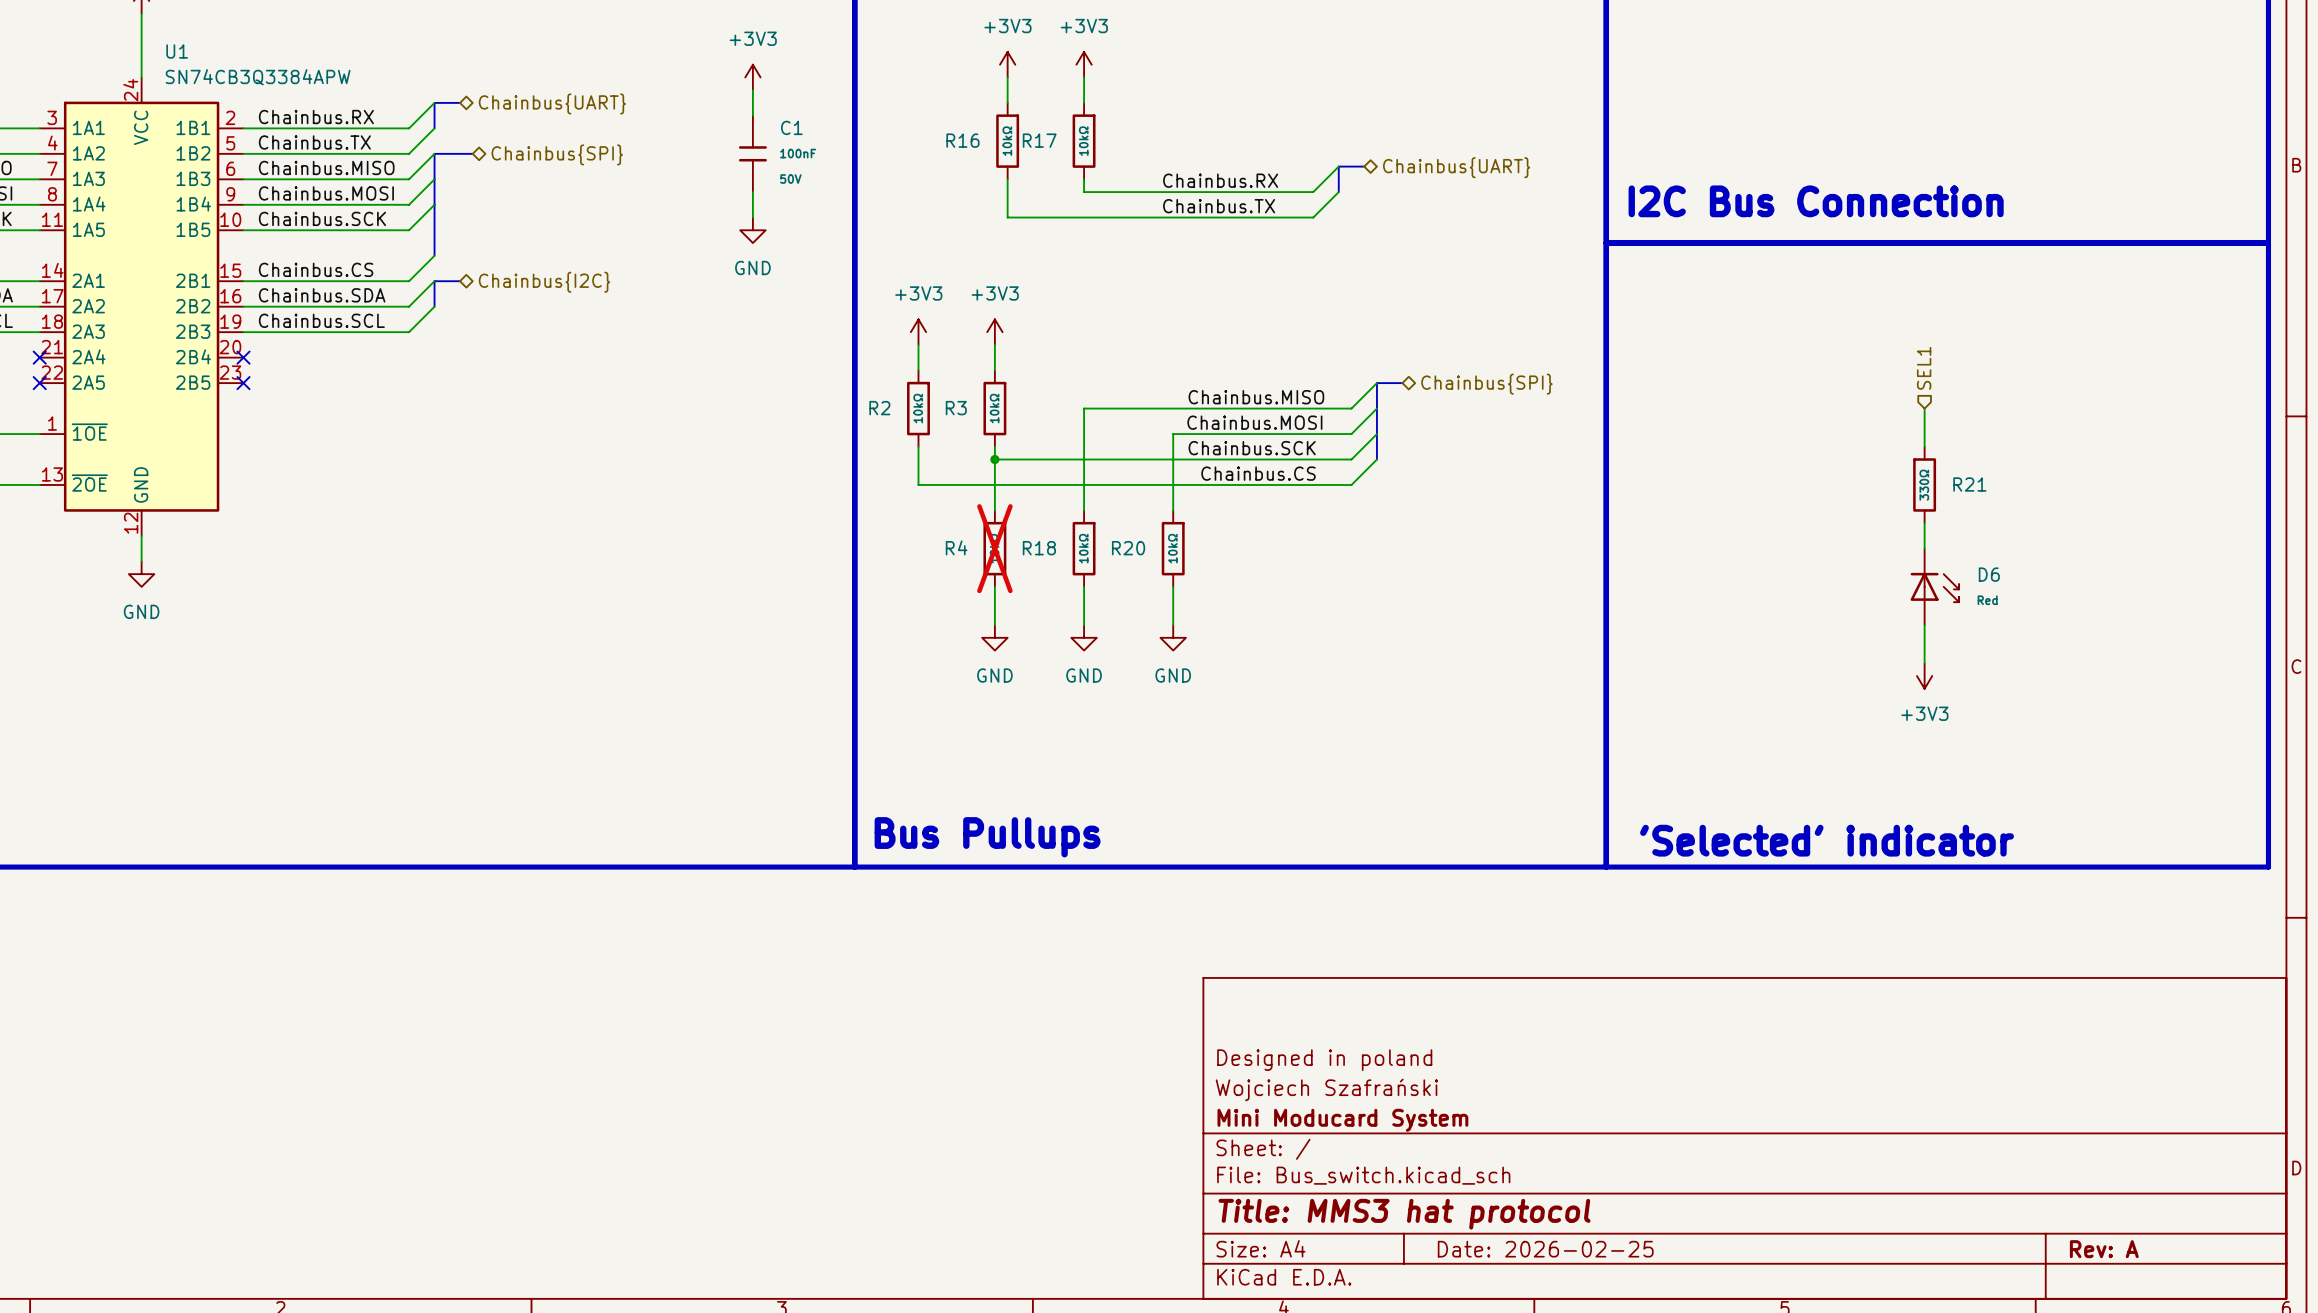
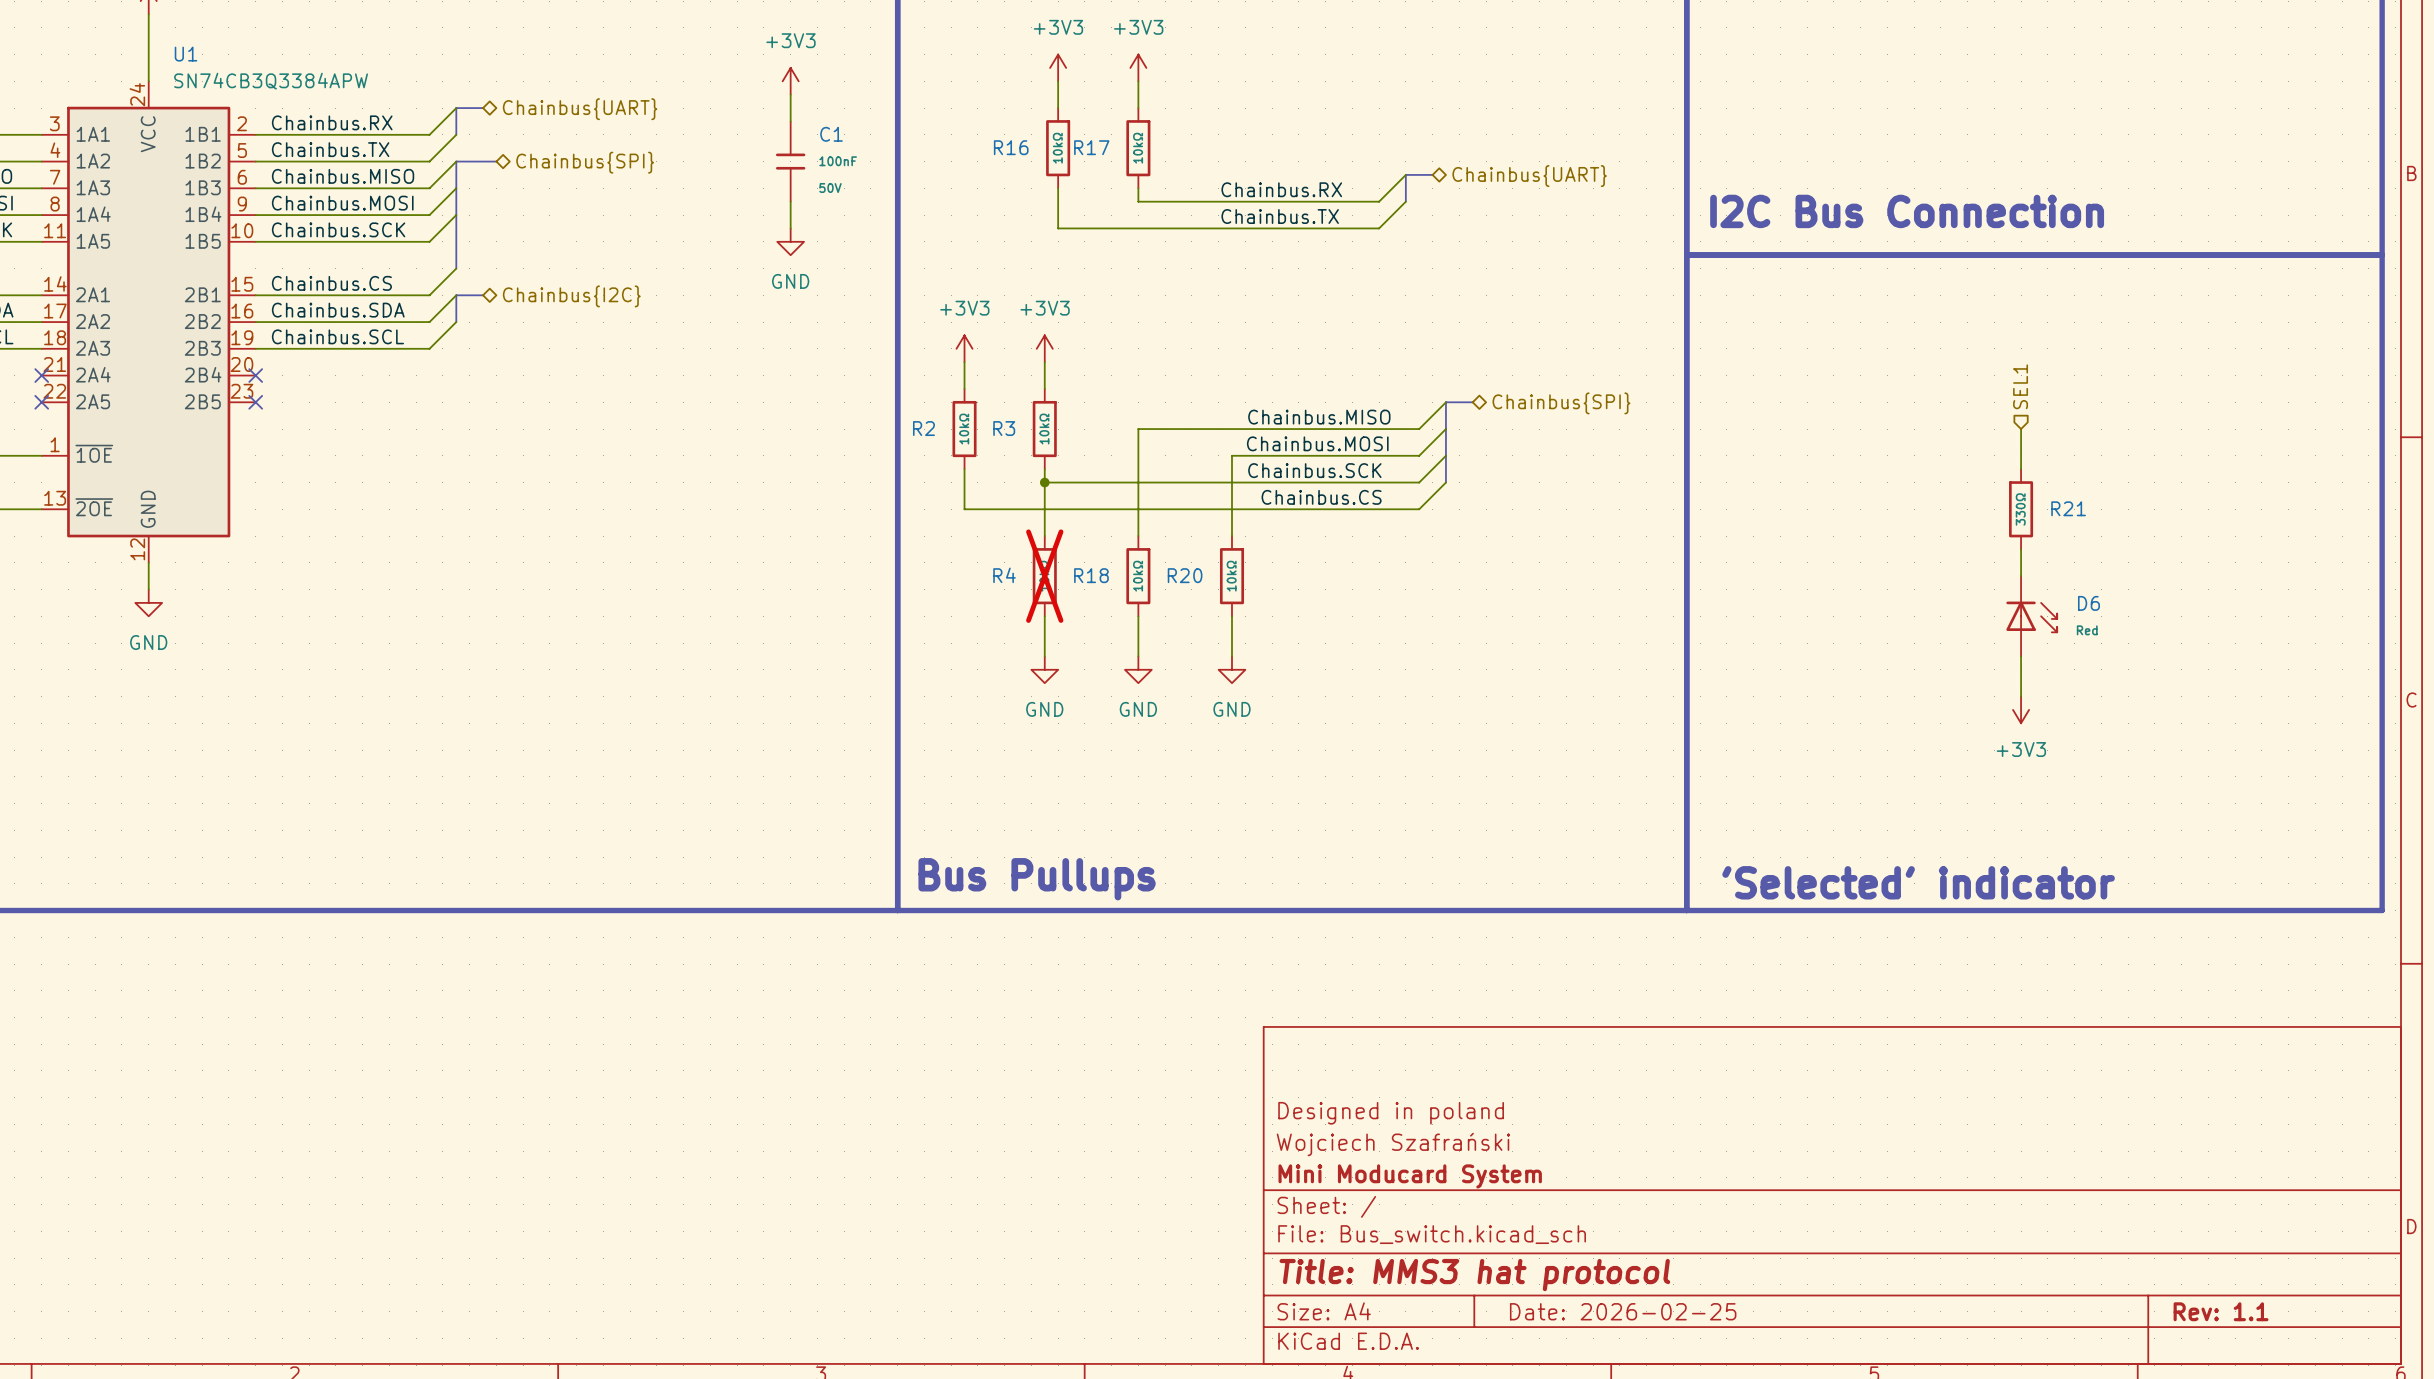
title block: Rev: A (2104, 1249) -> Rev: 1.1 (2221, 1311)

